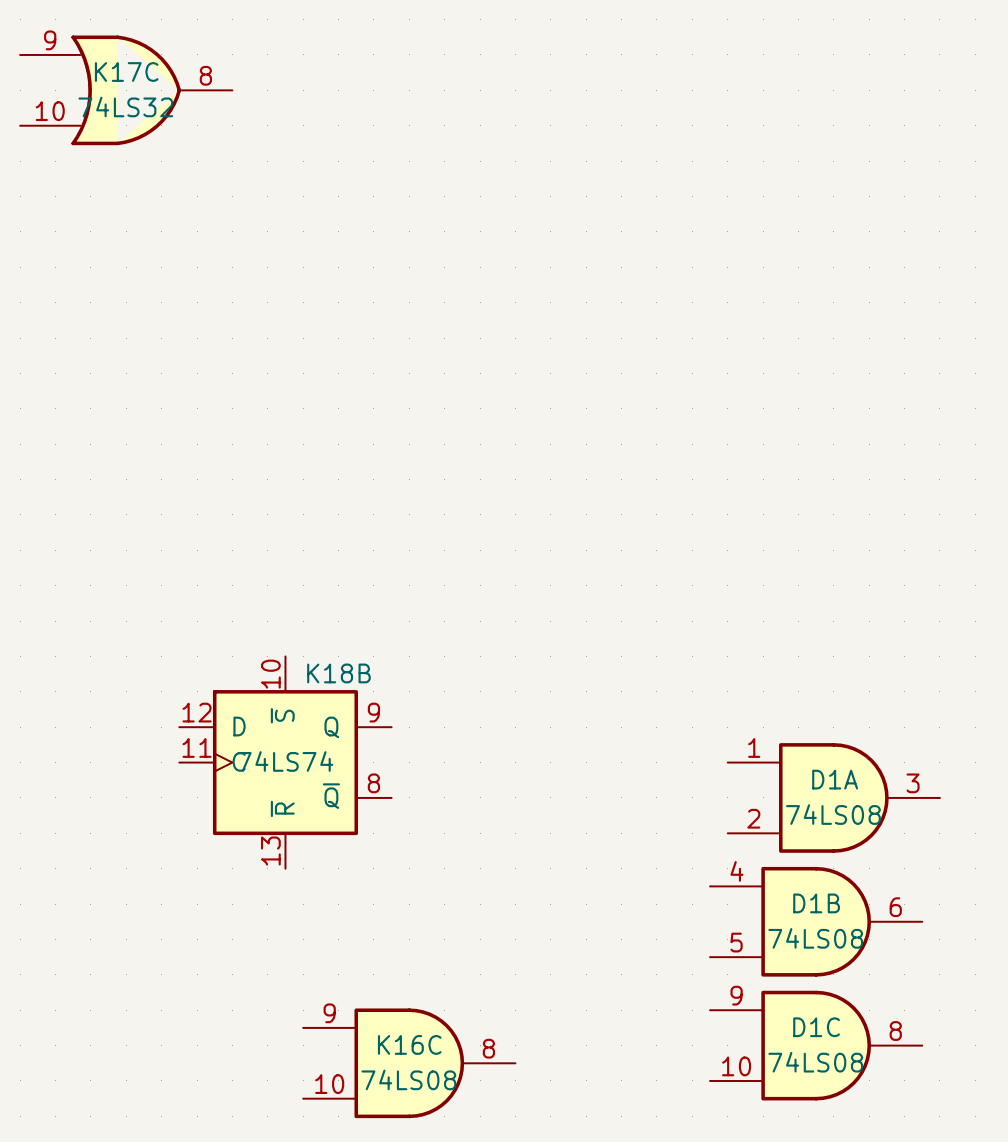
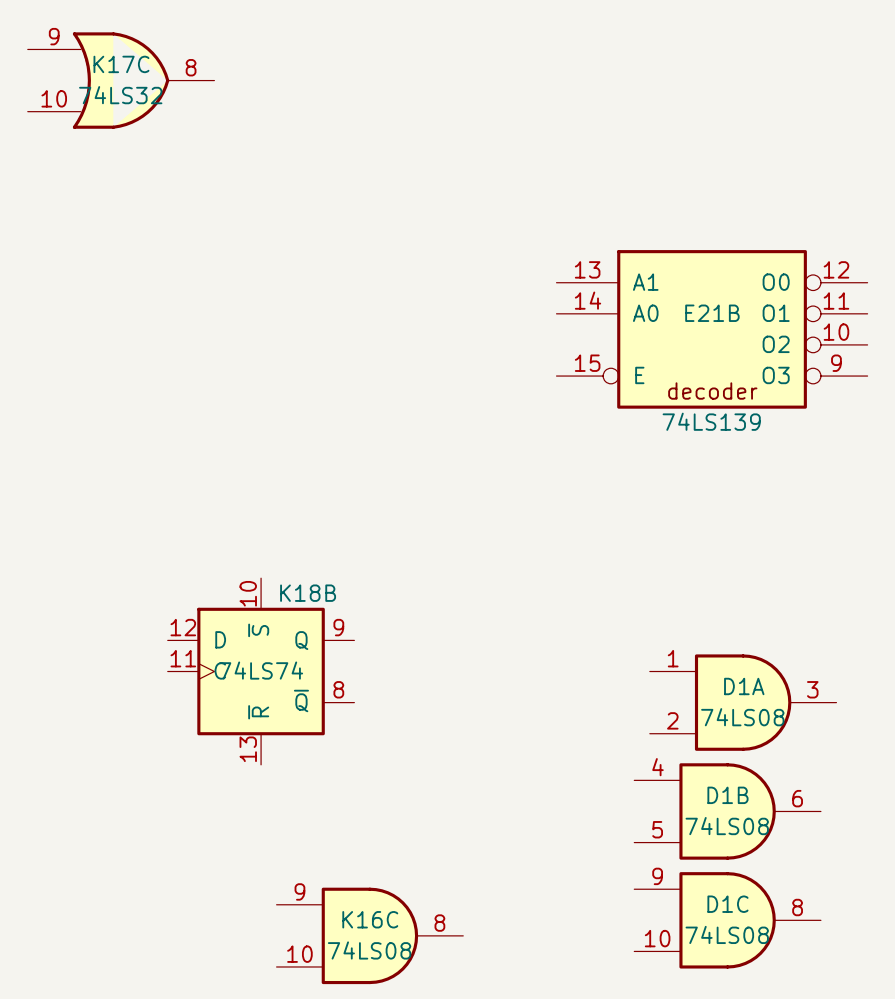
E21B: none -> 74LS139 (712, 329)

